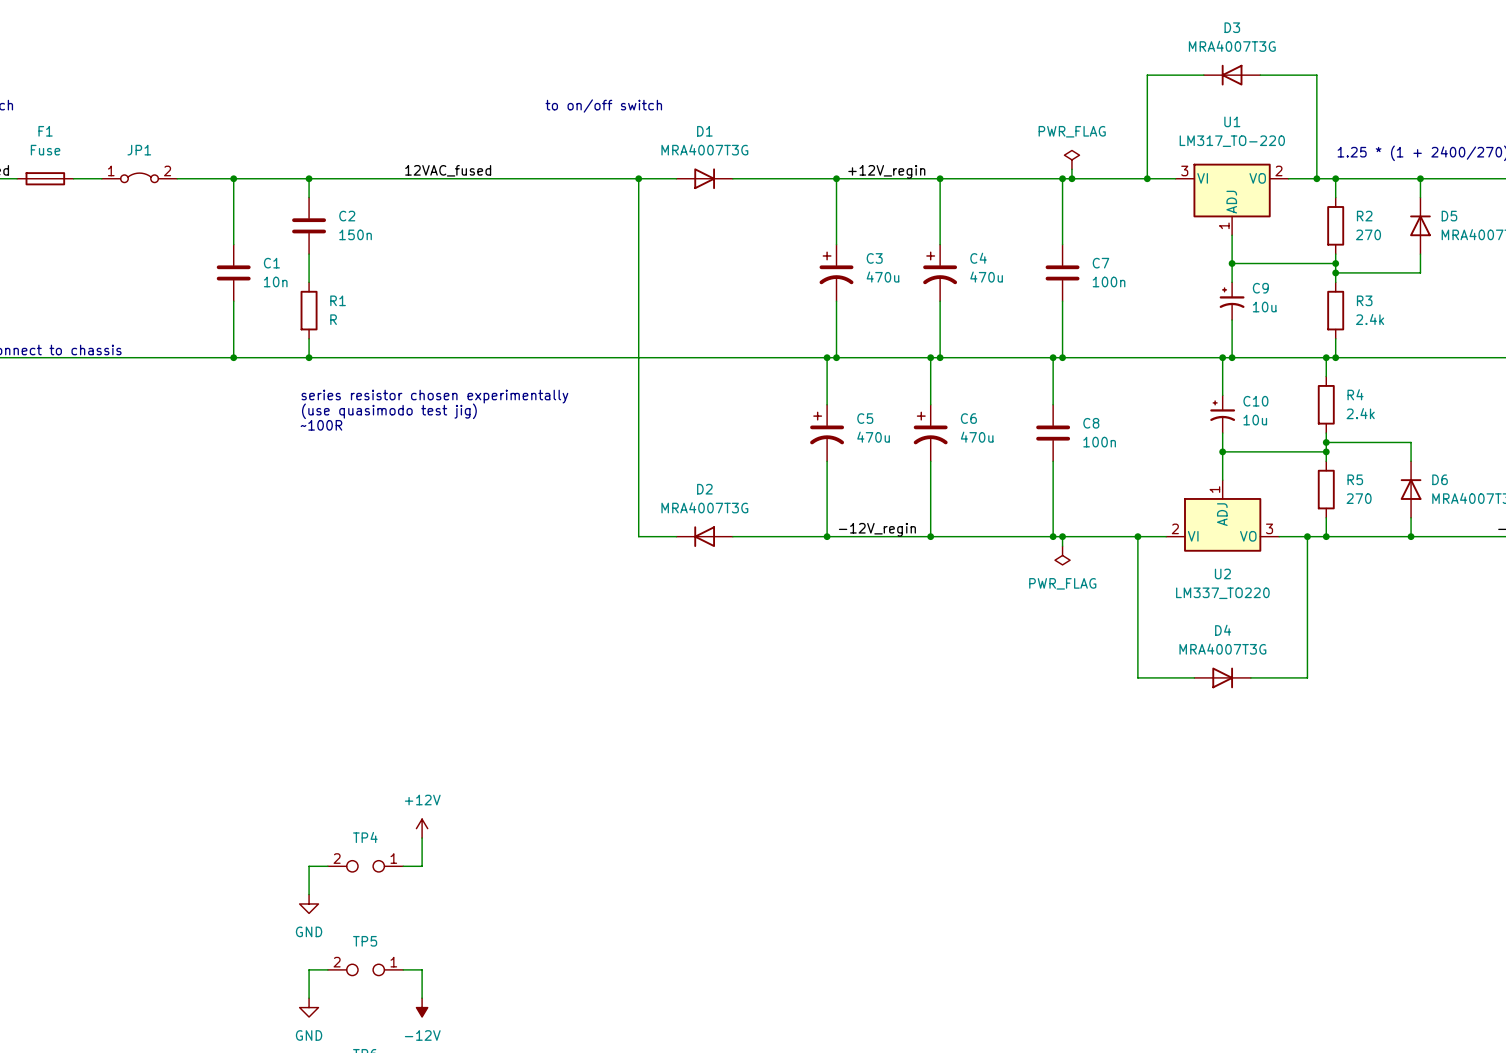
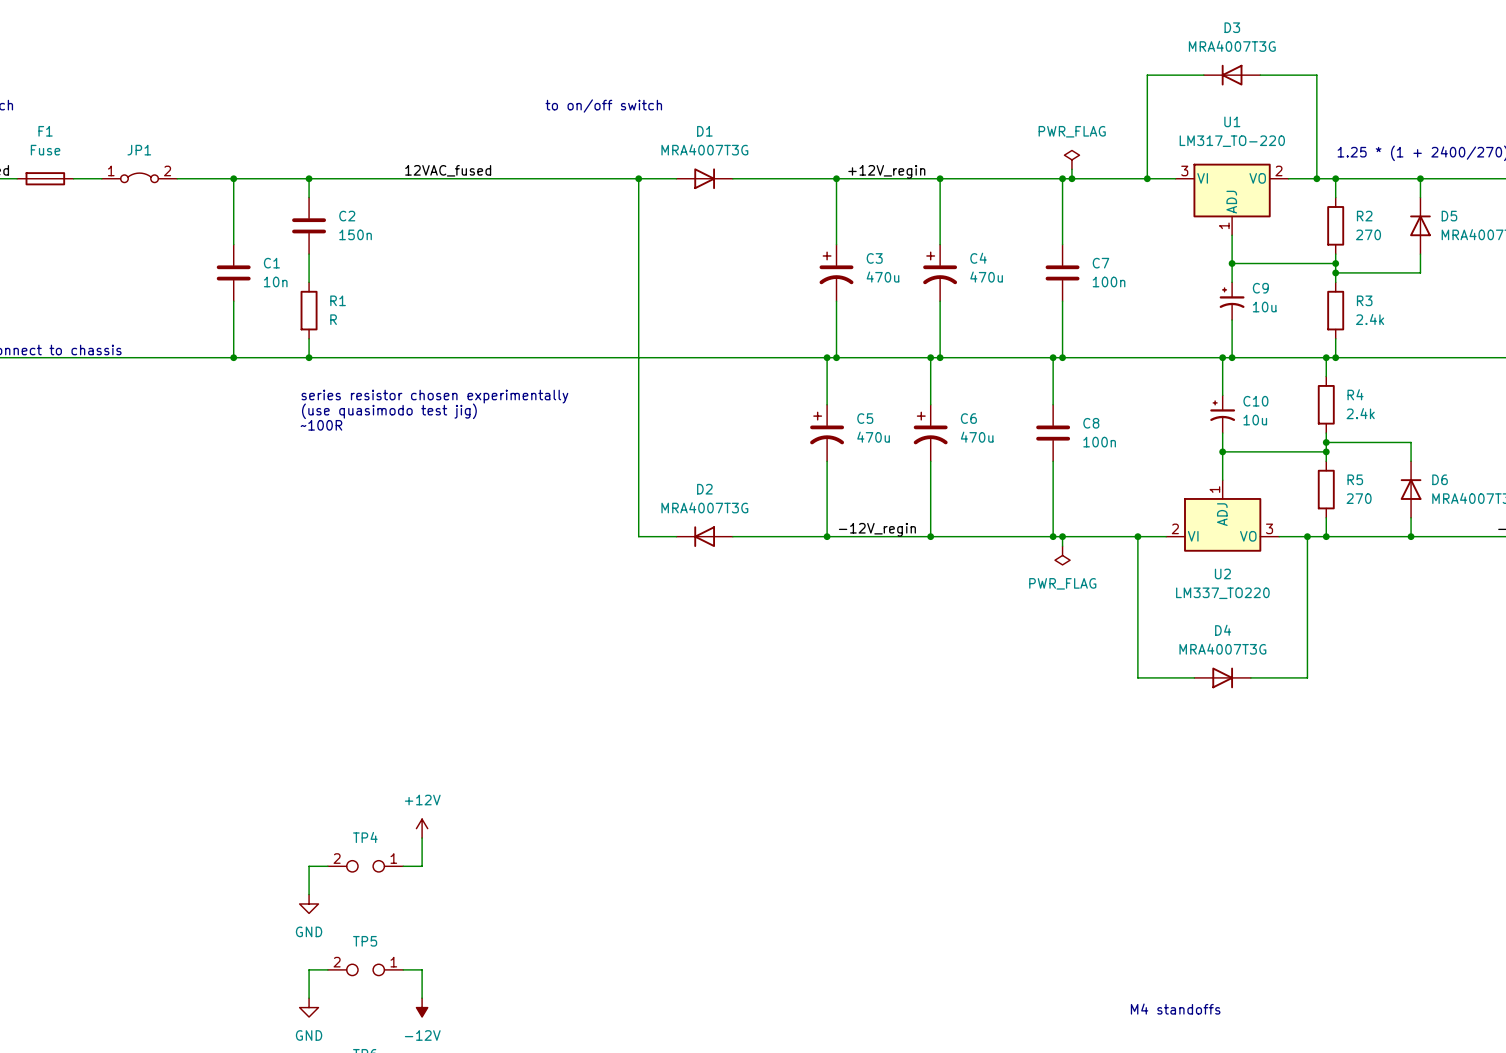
text: none -> M4 standoffs (1175, 1009)

